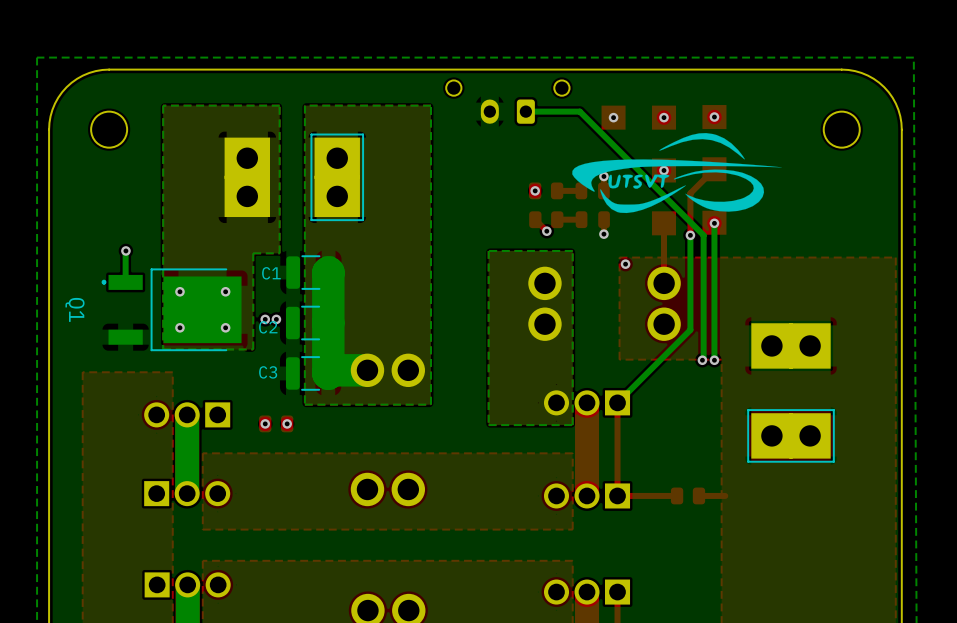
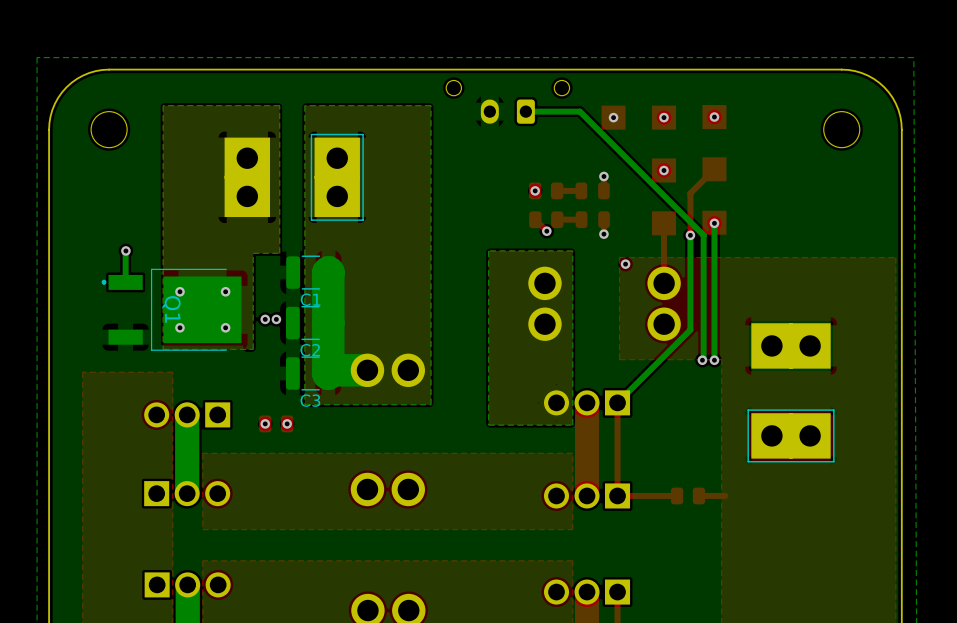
drawing: [572, 133, 782, 214] -> none
C1 name position: C1 (271, 273) -> C1 (310, 299)
Q1 name position: Q1 (75, 309) -> Q1 (171, 309)
C2 name position: C2 (268, 327) -> C2 (310, 350)
C3 name position: C3 (268, 372) -> C3 (310, 400)

